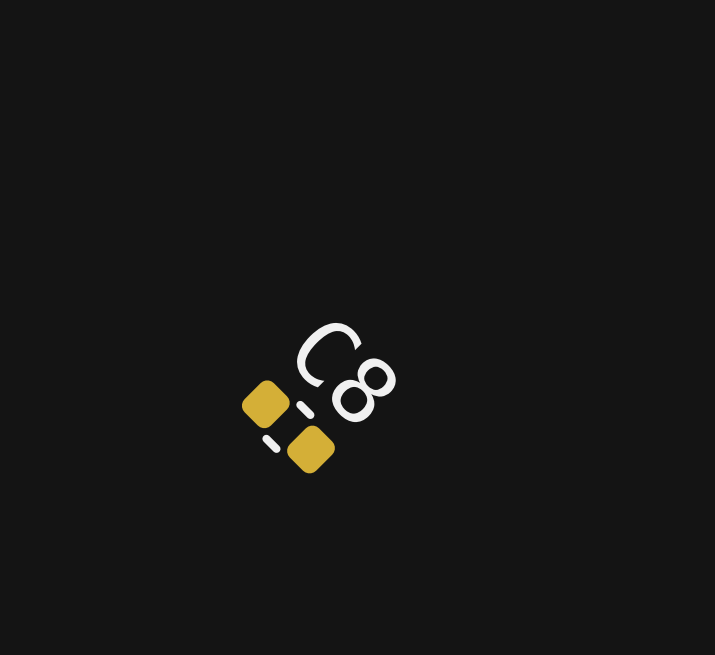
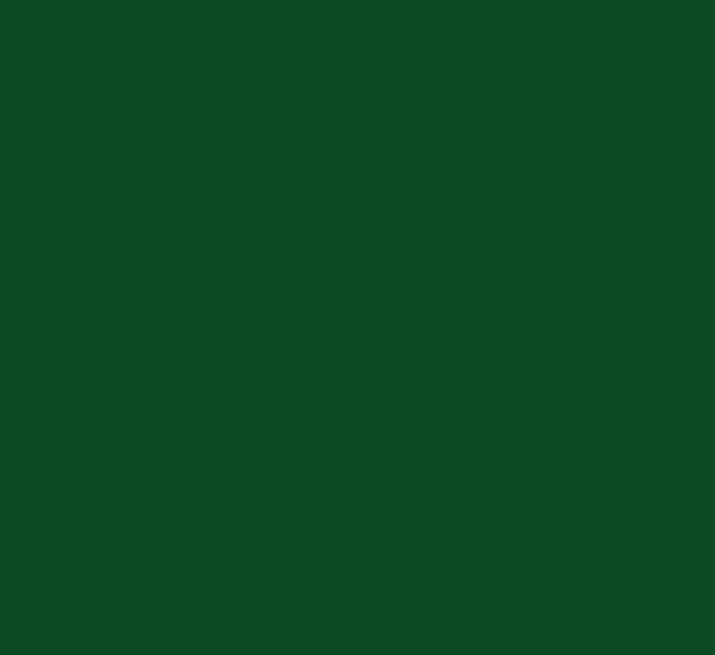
C8: (288, 426) -> none

